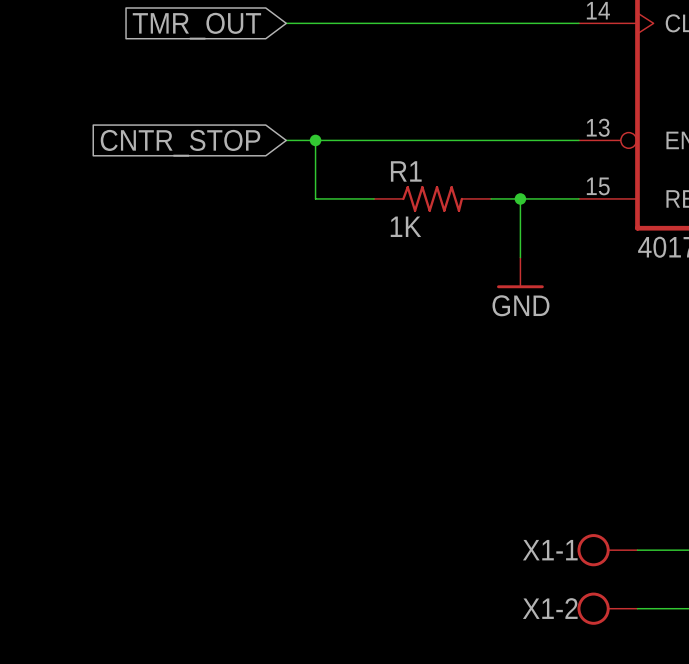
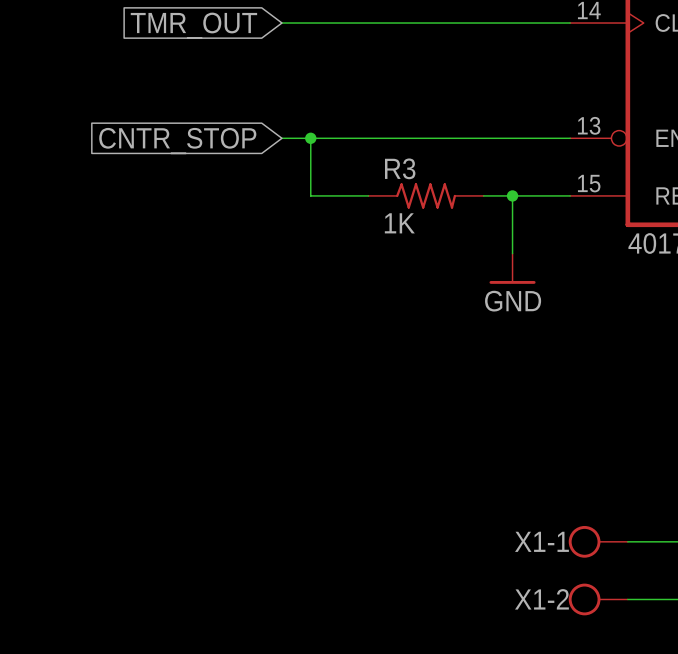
R1 name: R1 (406, 171) -> R3 (400, 168)

